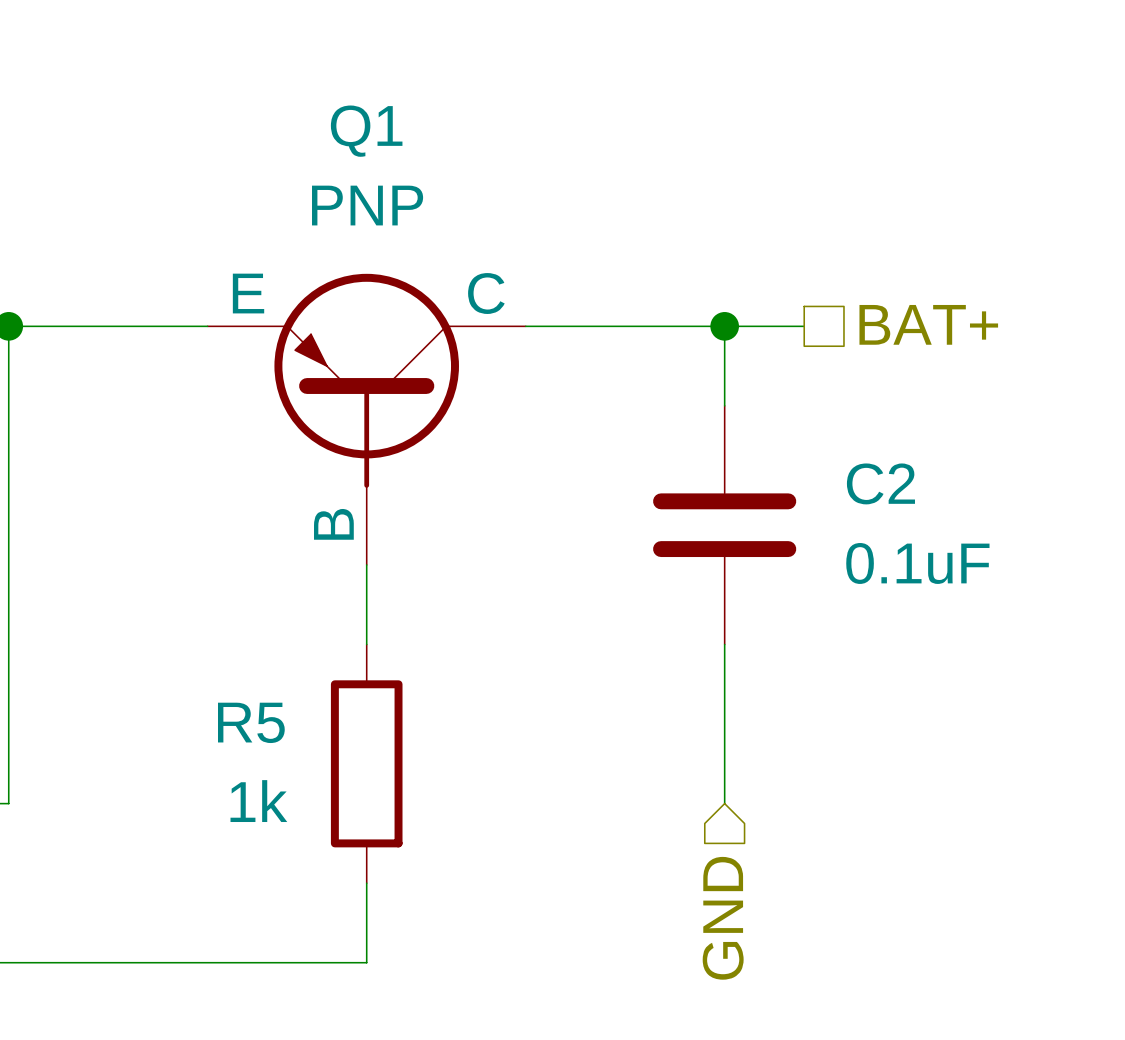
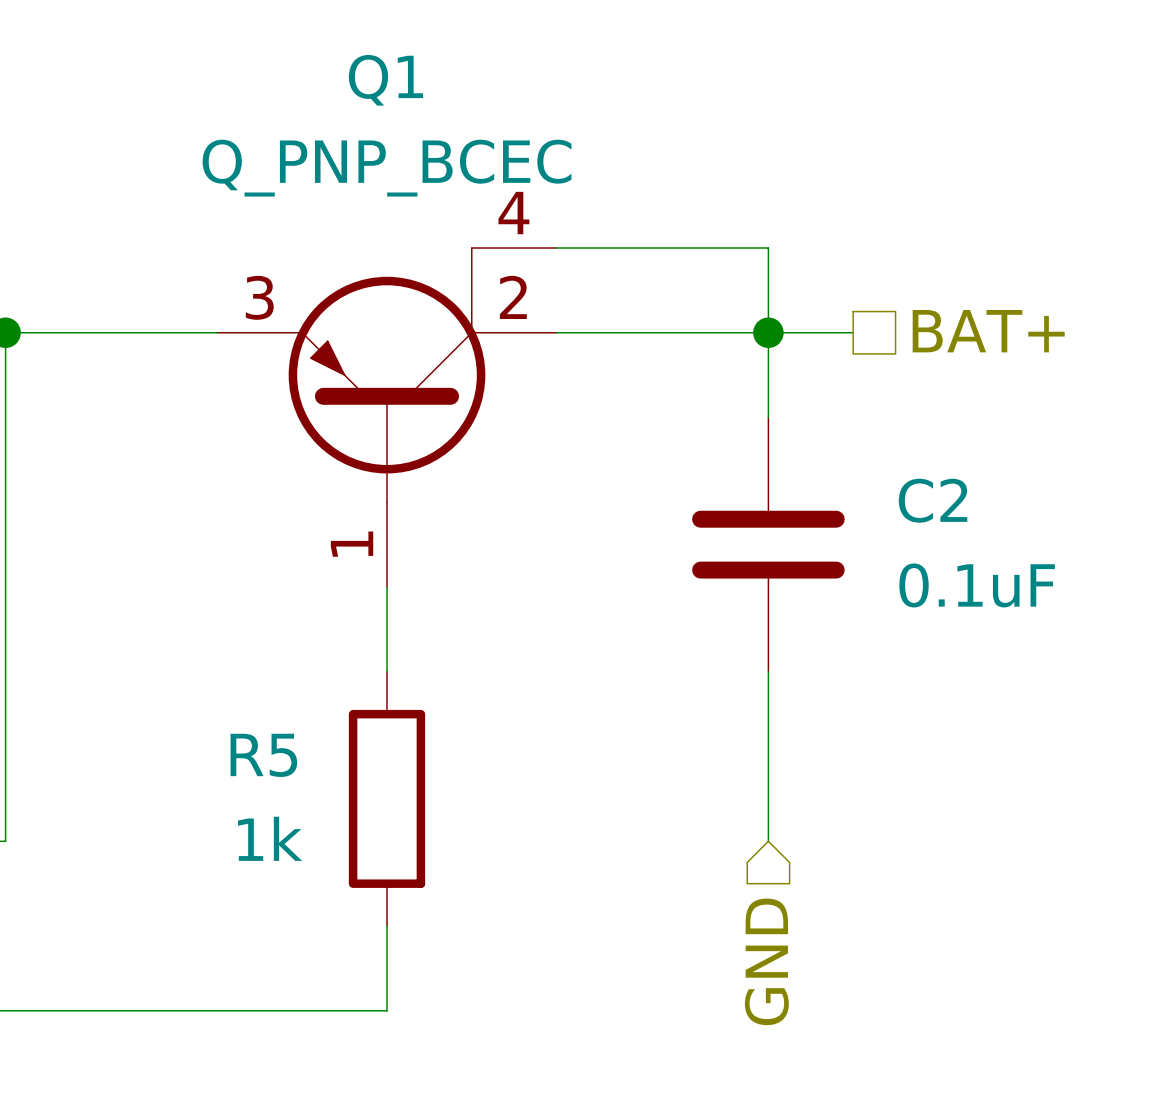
Q1 value: PNP (367, 205) -> Q_PNP_BCEC (387, 168)
wire: none -> (556, 248) (768, 248) (768, 332)
Q1 symbol: [207, 273, 526, 565] -> [217, 248, 557, 588]

